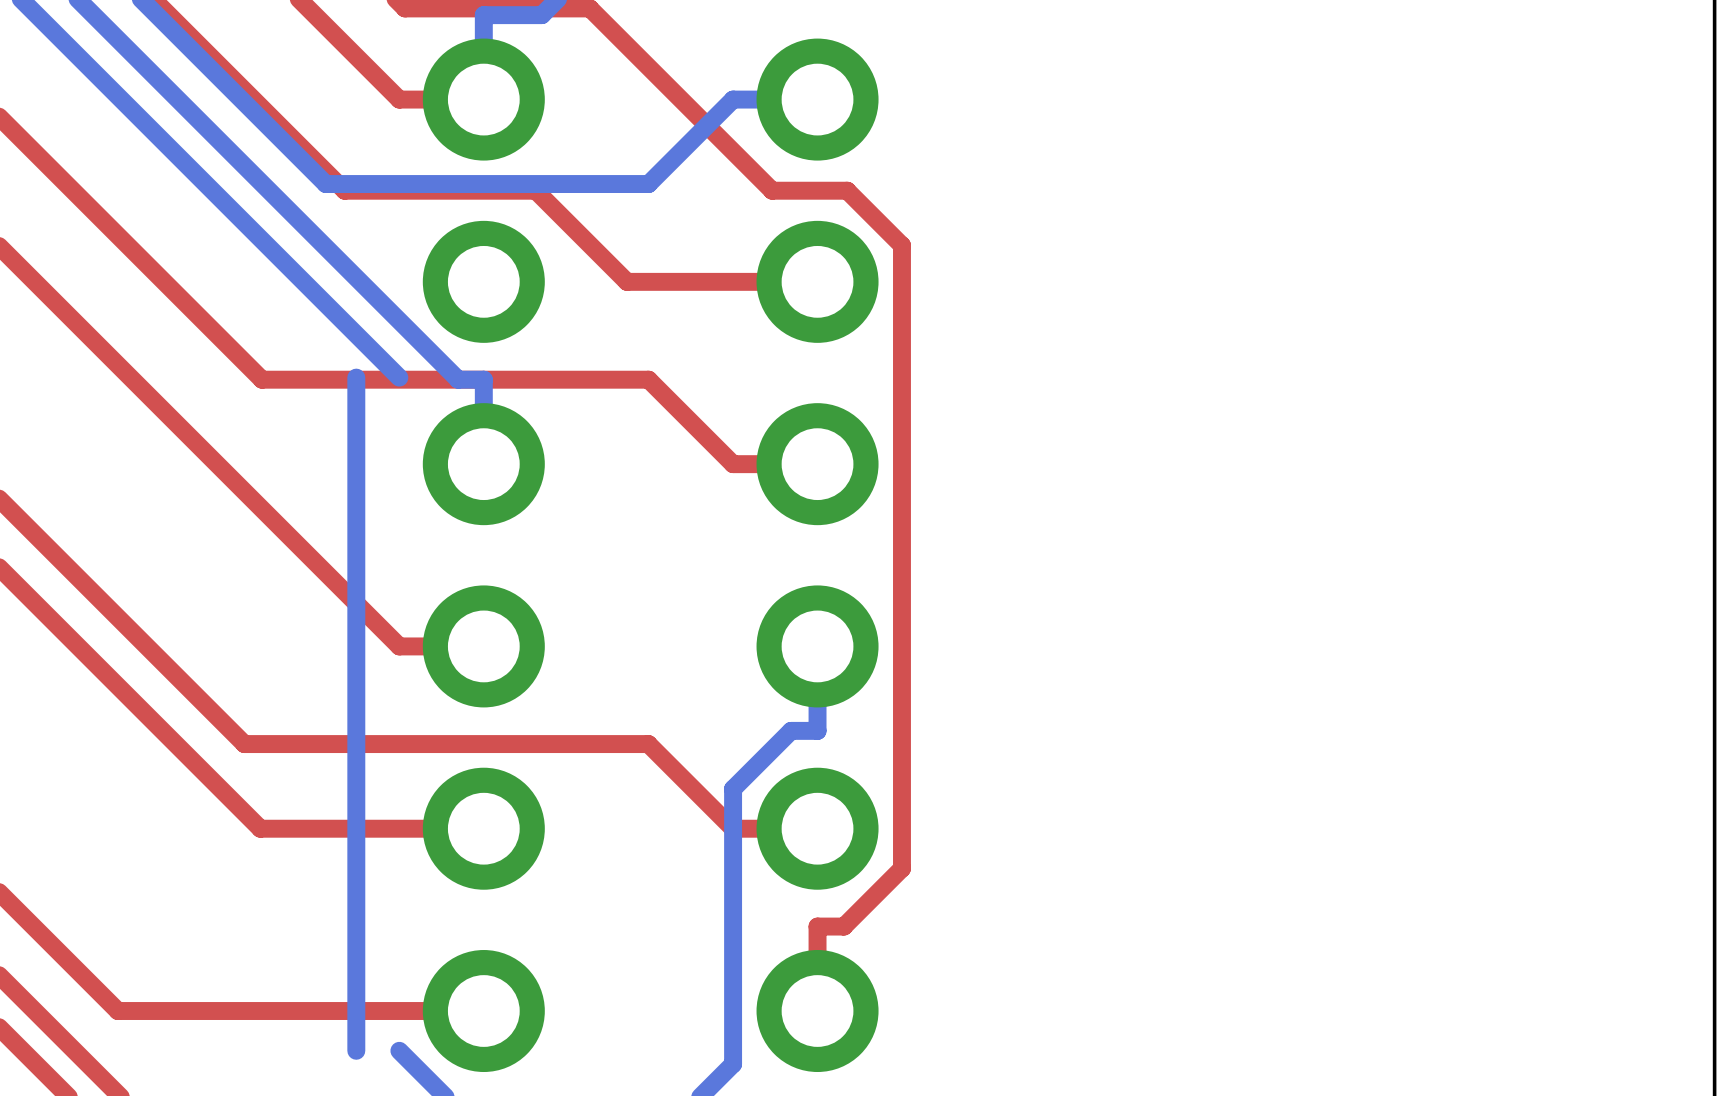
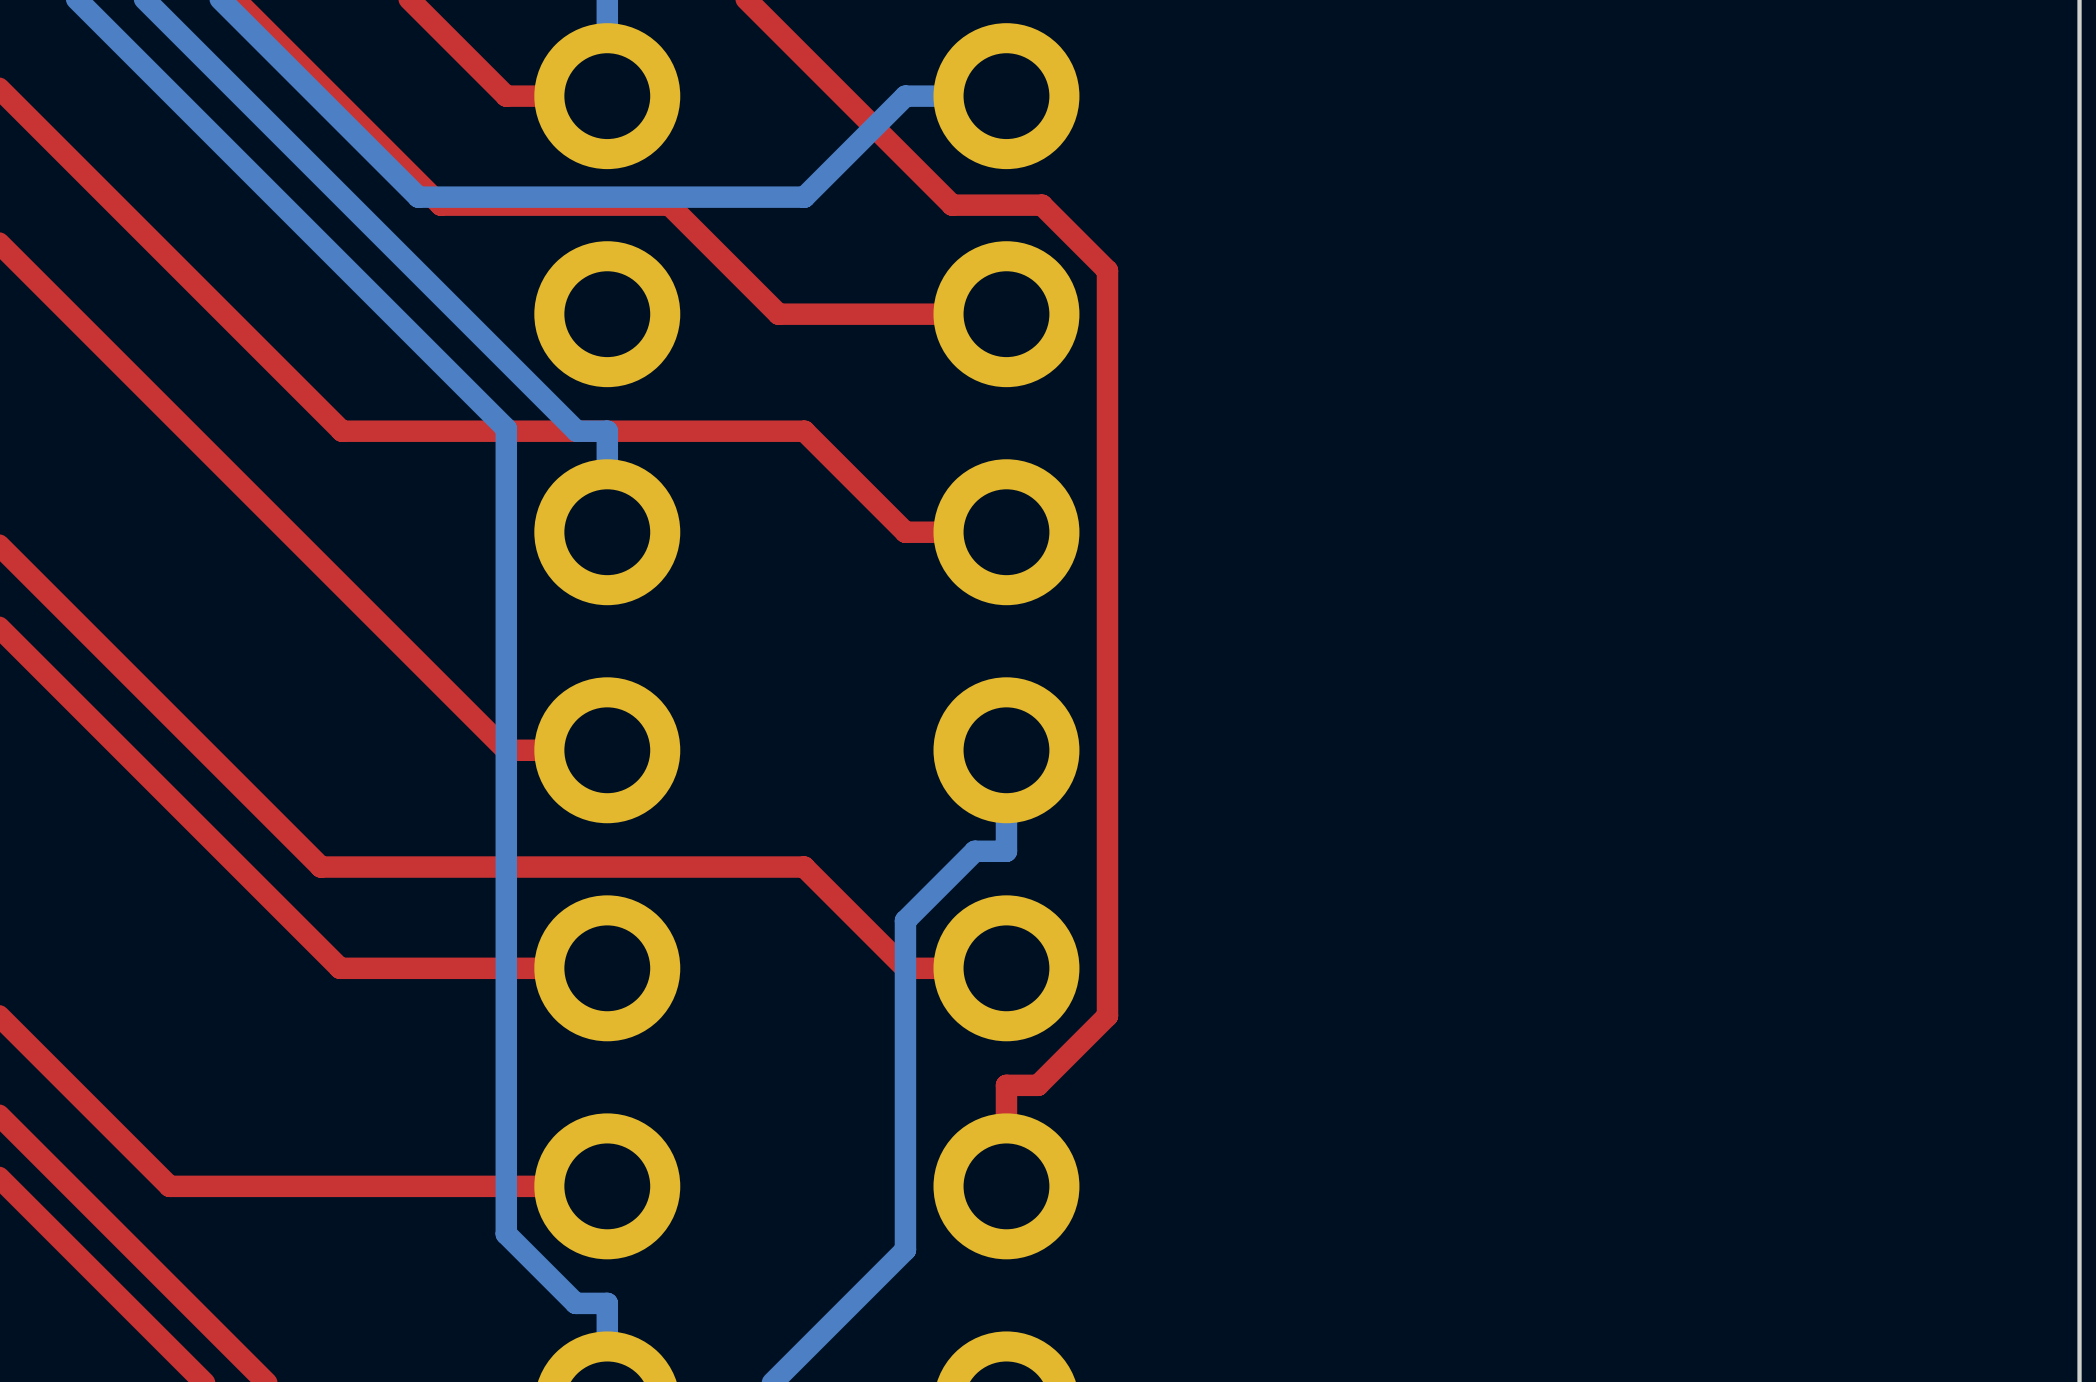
bottom track: (356, 377) (356, 1050) -> (506, 428) (506, 1233)

